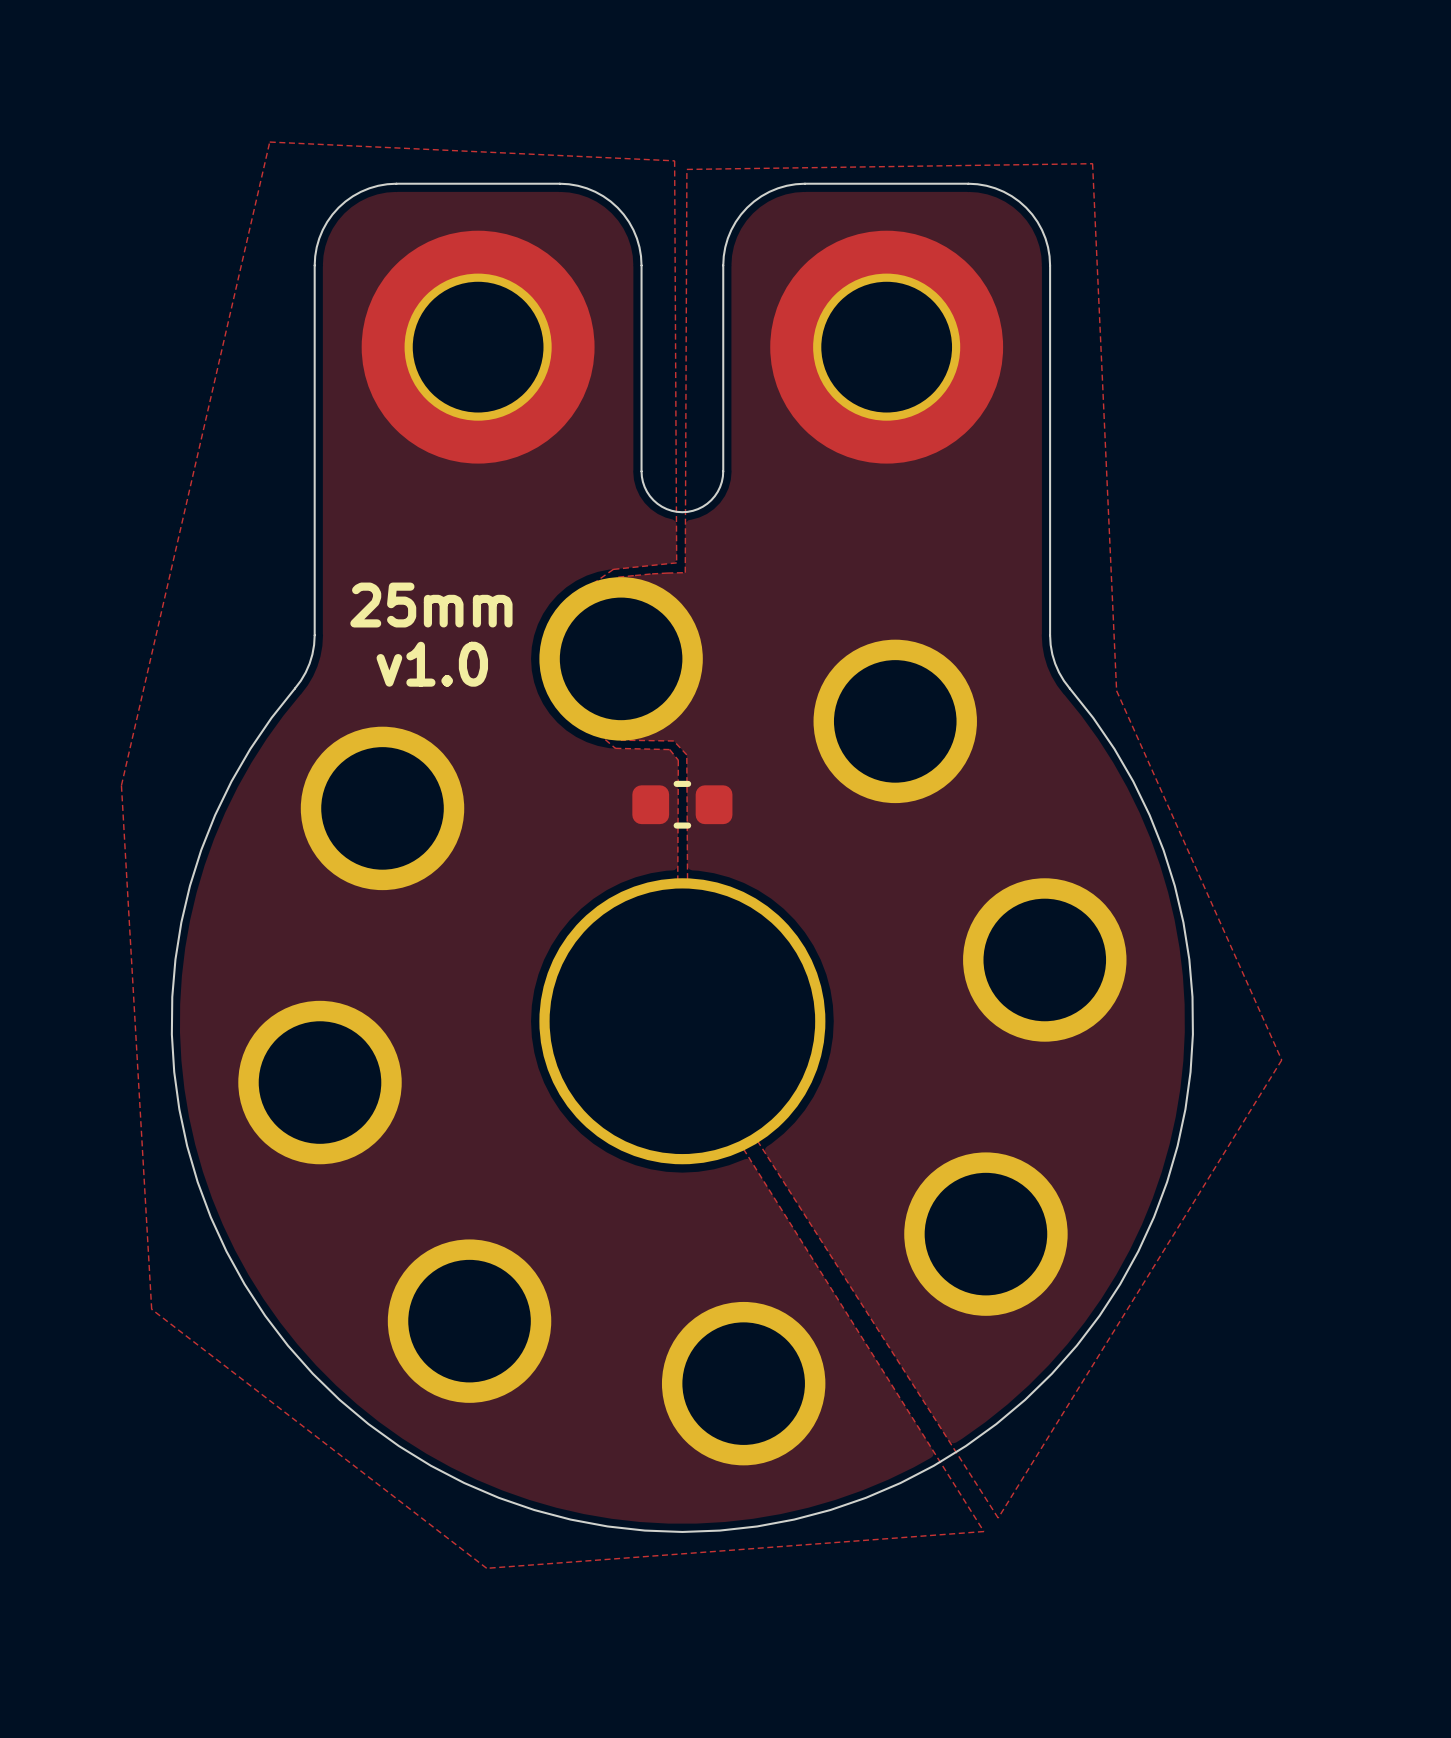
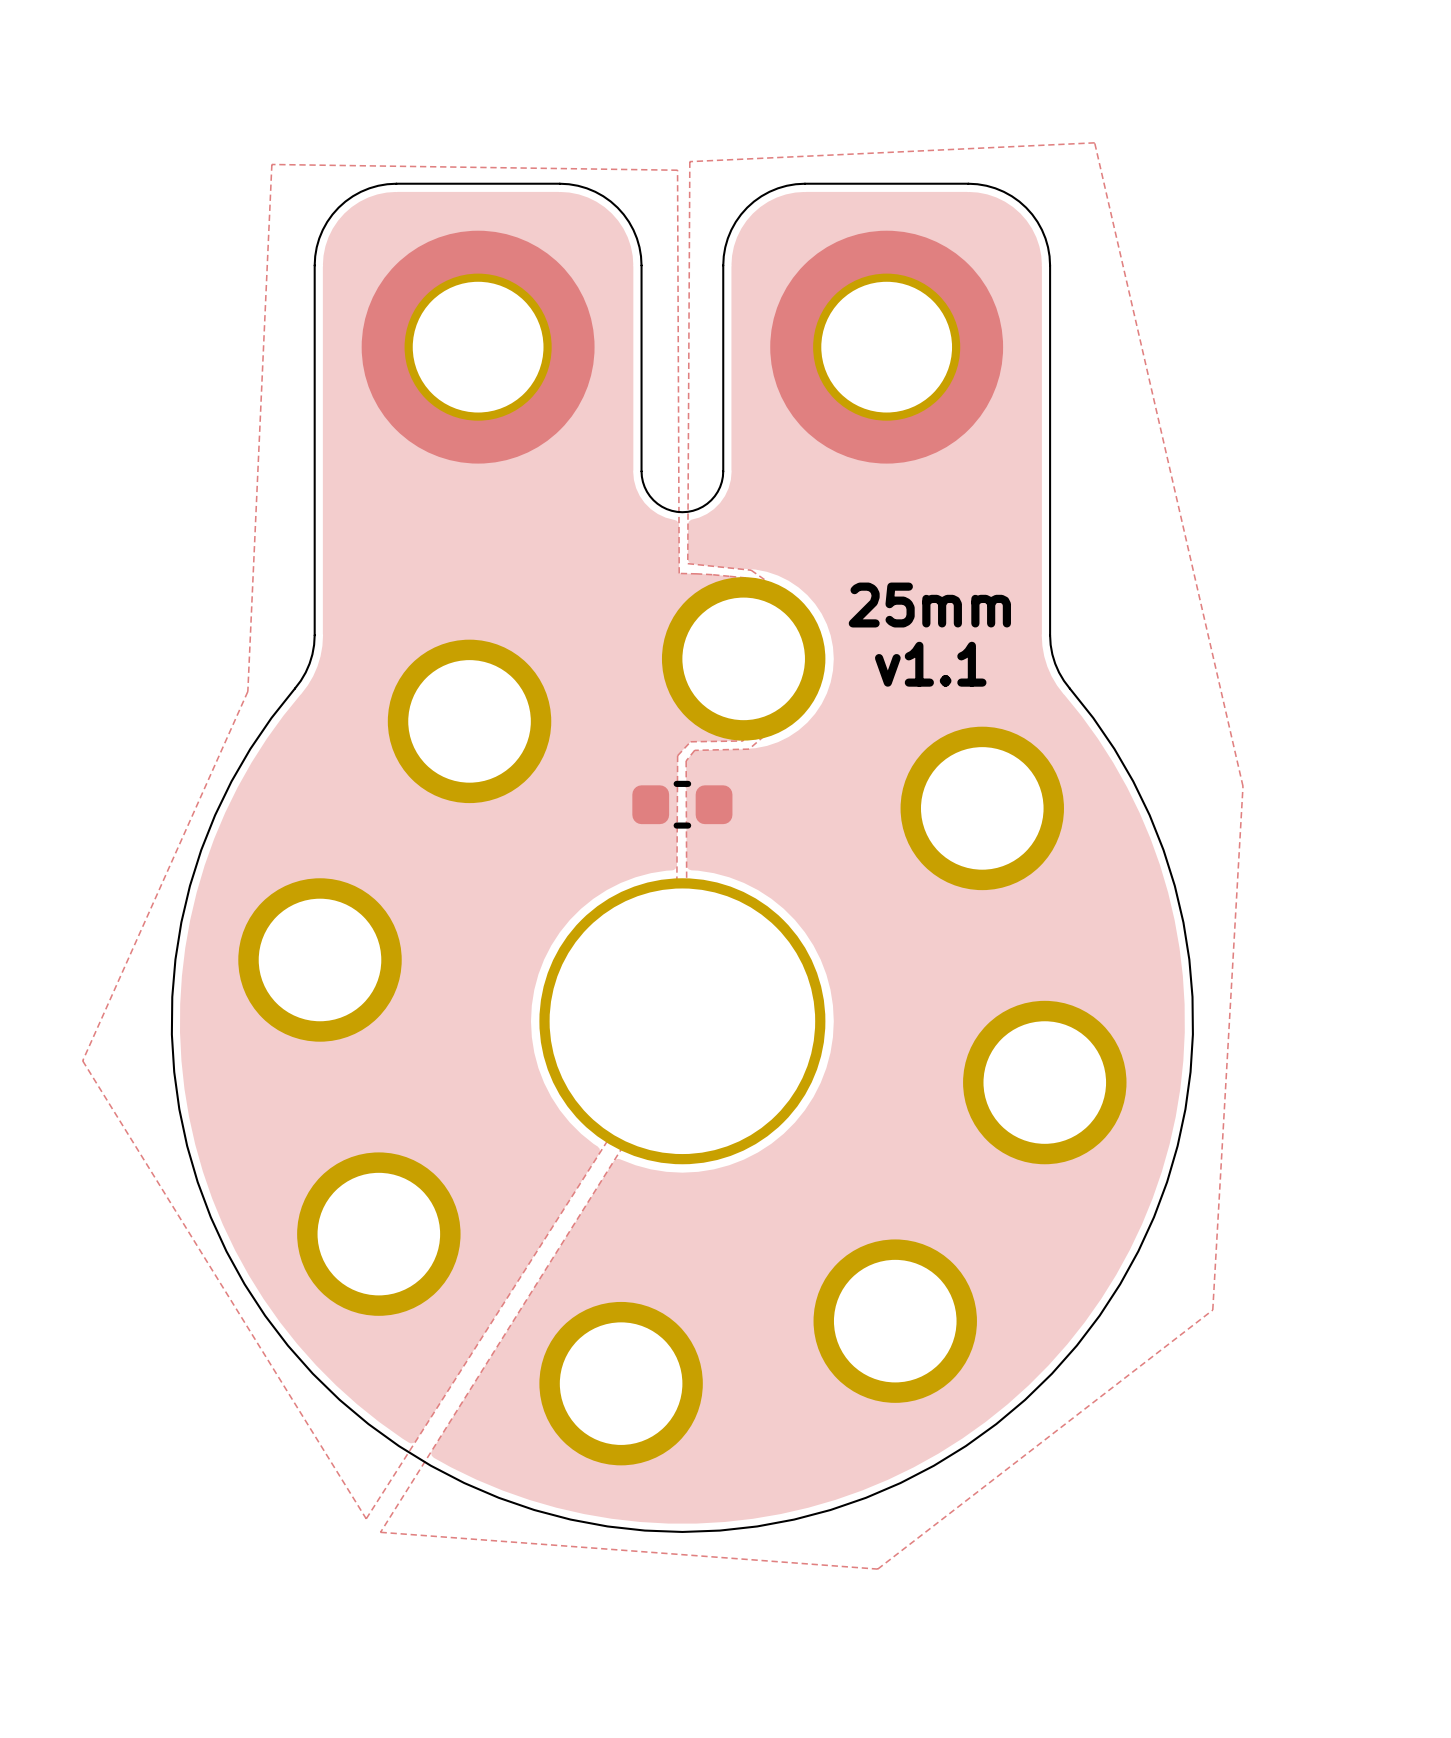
zone outline: (269, 142) (121, 785) (151, 1309) (486, 1568) (983, 1531) (677, 1043) (678, 760) (669, 749) (615, 748) (554, 695) (549, 640) (569, 600) (613, 569) (676, 562) (674, 160) (269, 142) -> (271, 164) (247, 691) (82, 1060) (366, 1518) (676, 1033) (677, 755) (690, 741) (743, 740) (746, 577) (679, 573) (677, 170) (271, 164)
zone outline: (1092, 163) (686, 169) (685, 572) (618, 577) (621, 740) (673, 740) (686, 754) (688, 1032) (998, 1518) (1281, 1060) (1116, 690) (1092, 163) -> (1094, 142) (689, 161) (687, 563) (751, 570) (795, 601) (815, 641) (809, 696) (749, 749) (694, 750) (686, 760) (687, 1044) (380, 1532) (877, 1569) (1212, 1310) (1243, 786) (1094, 142)
text position: 25mm (431, 605) -> 25mm (929, 605)
part: (621, 658) -> none
part: none -> (743, 658)
text: v1.0 (432, 664) -> none
text: none -> v1.1 (930, 664)
part: none -> (469, 721)
part: (895, 721) -> none
part: (382, 808) -> none
part: none -> (982, 808)
part: none -> (320, 959)
part: (1044, 959) -> none
part: (320, 1082) -> none
part: none -> (1044, 1082)
part: none -> (378, 1234)
part: (985, 1234) -> none
part: (469, 1321) -> none
part: none -> (895, 1321)
part: none -> (621, 1383)
part: (743, 1383) -> none

